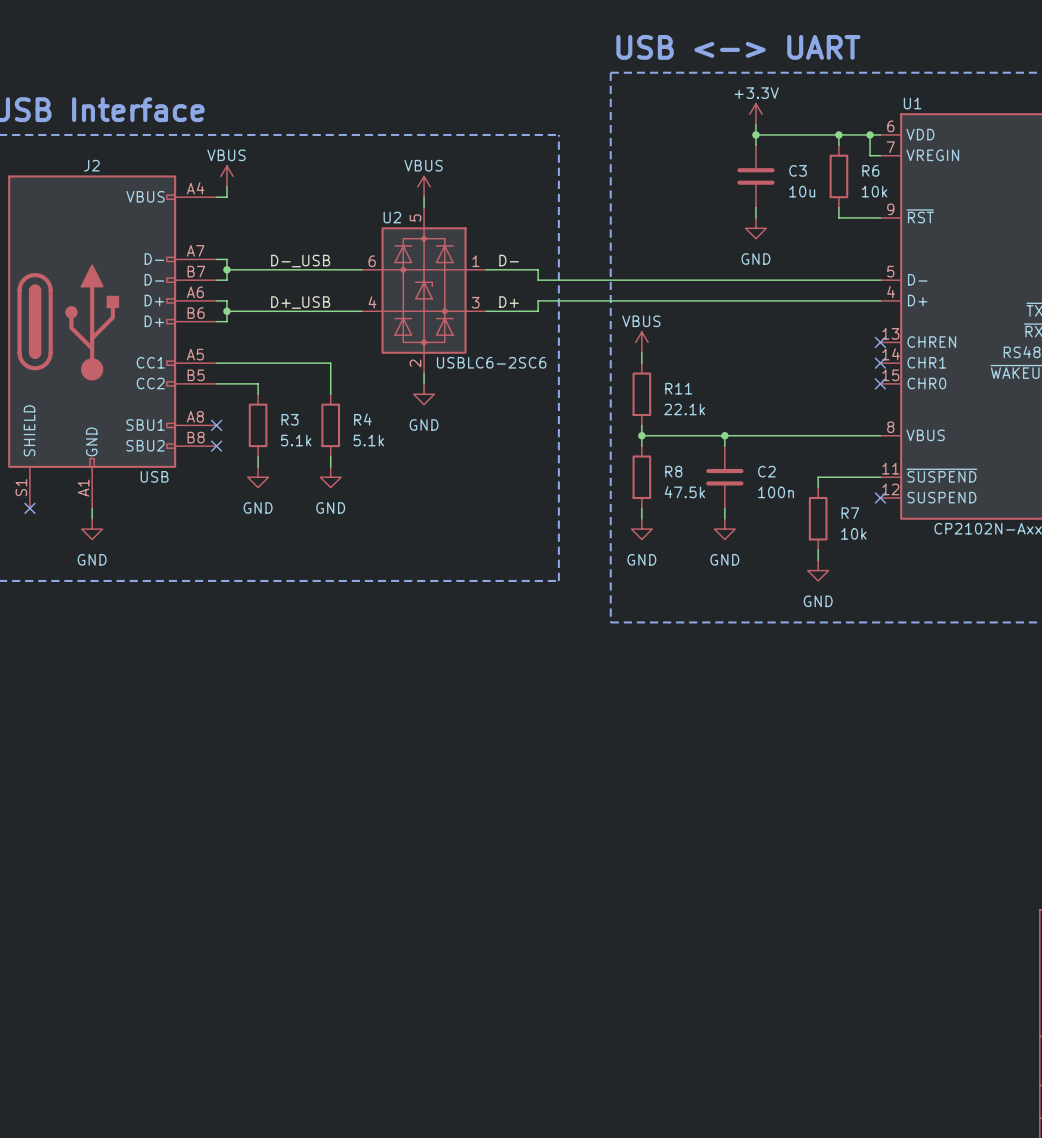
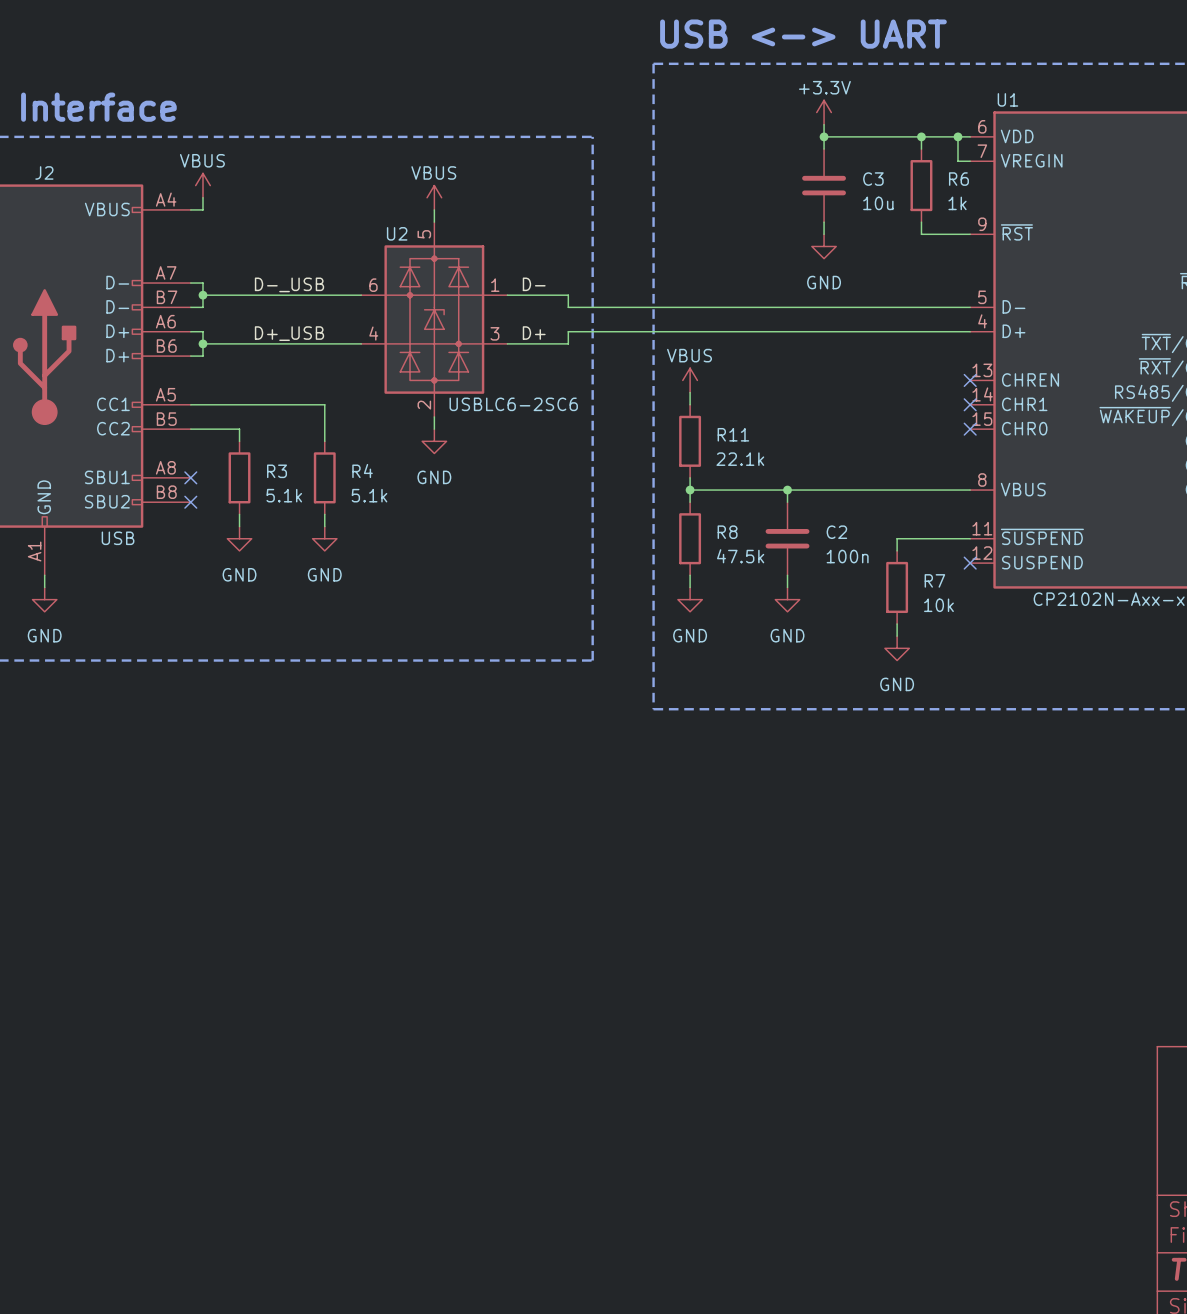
R6 value: 10k (874, 191) -> 1k (957, 203)

